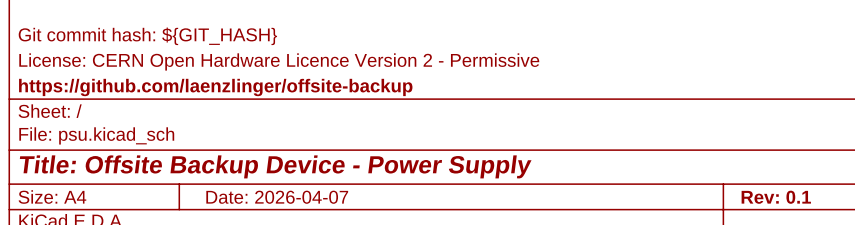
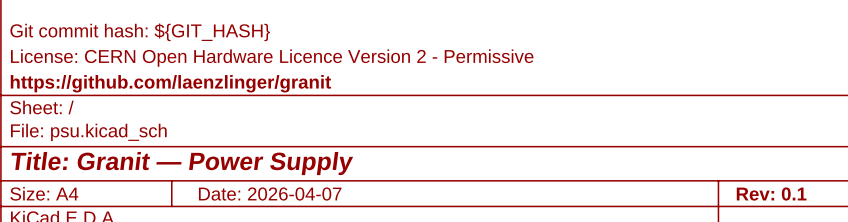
title block: https://github.com/laenzlinger/offsite-backup (215, 87) -> https://github.com/laenzlinger/granit (170, 83)
title block: Title: Offsite Backup Device - Power Supply (275, 166) -> Title: Granit — Power Supply (182, 163)

